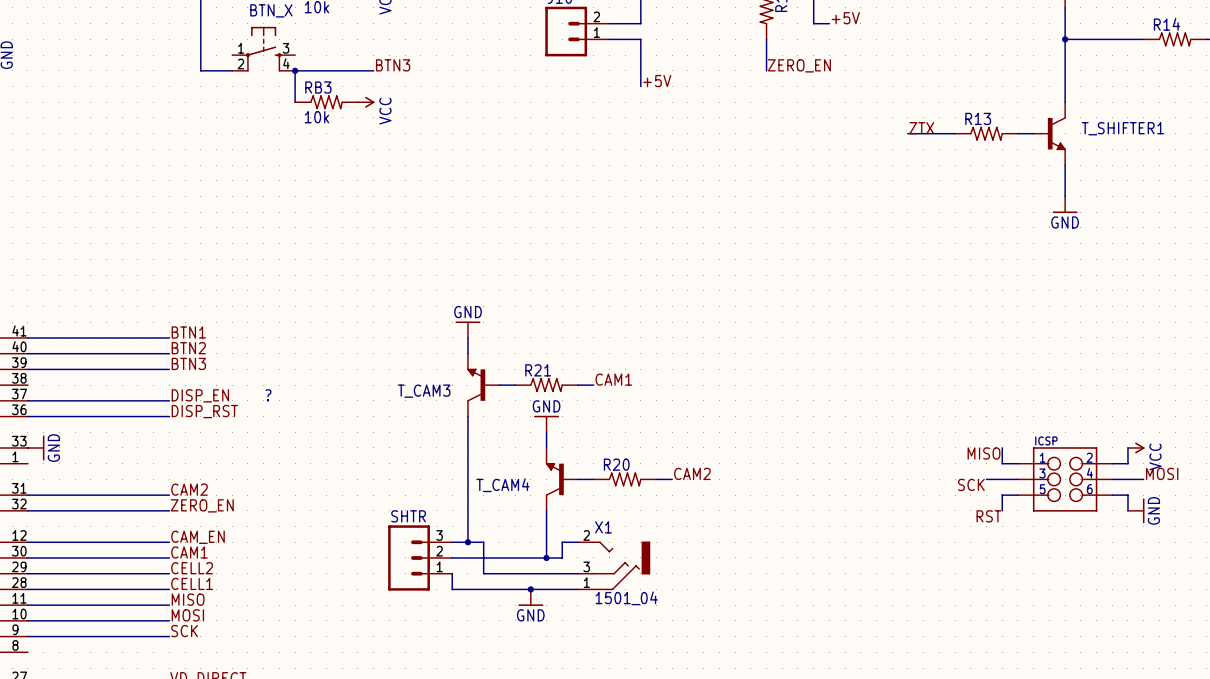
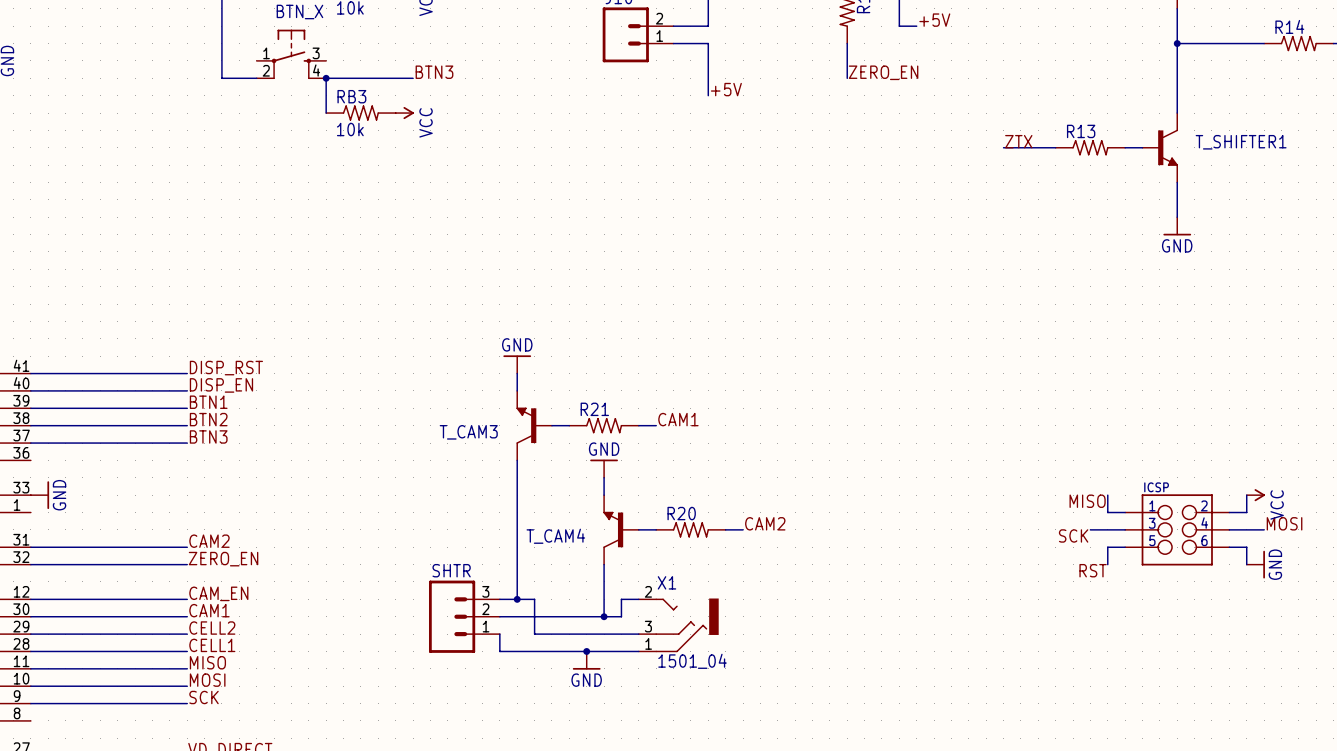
label: BTN1 (188, 332) -> DISP_RST (226, 368)
label: BTN2 (188, 348) -> DISP_EN (221, 385)
label: BTN3 (188, 363) -> BTN1 (208, 402)
label: none -> BTN2 (208, 419)
label: DISP_EN (200, 395) -> BTN3 (208, 436)
text: ? (268, 395) -> none
label: DISP_RST (204, 411) -> none
wire: (27, 416) (169, 416) -> (30, 425) (187, 425)

